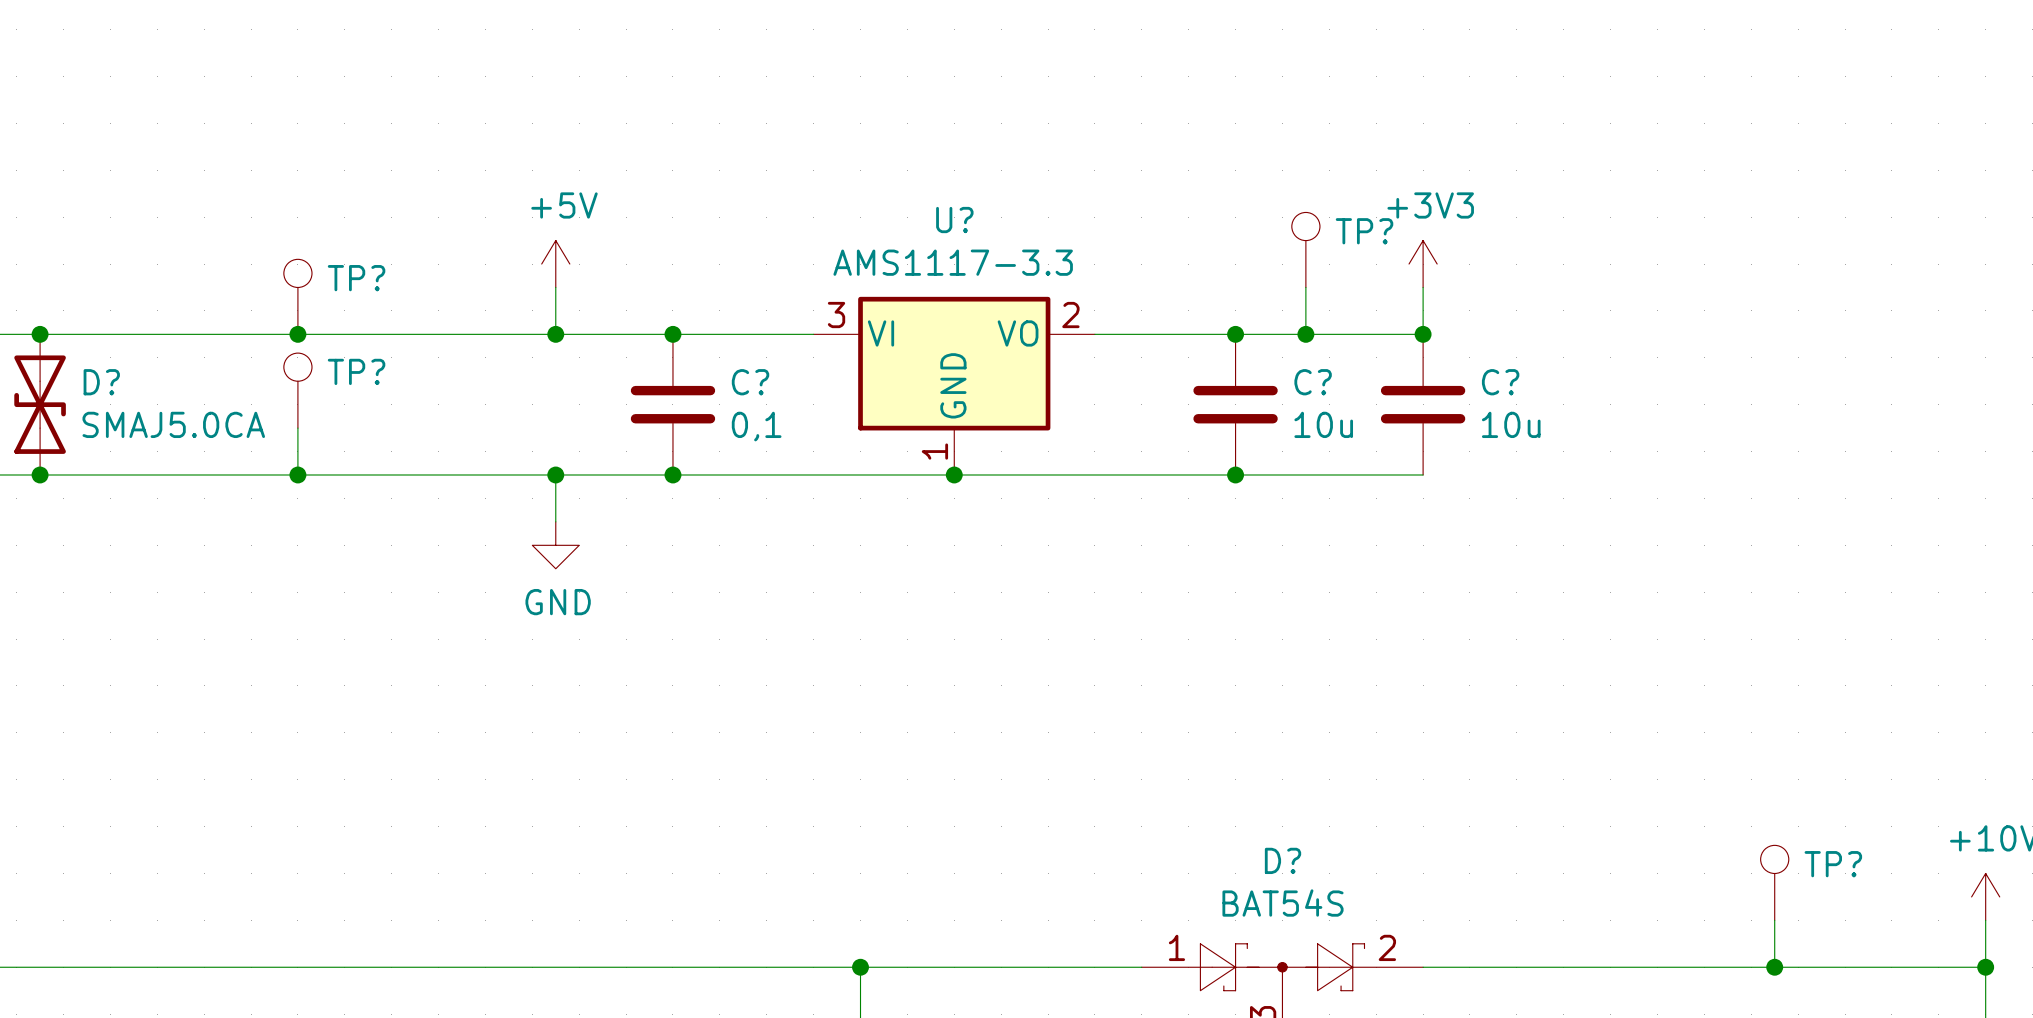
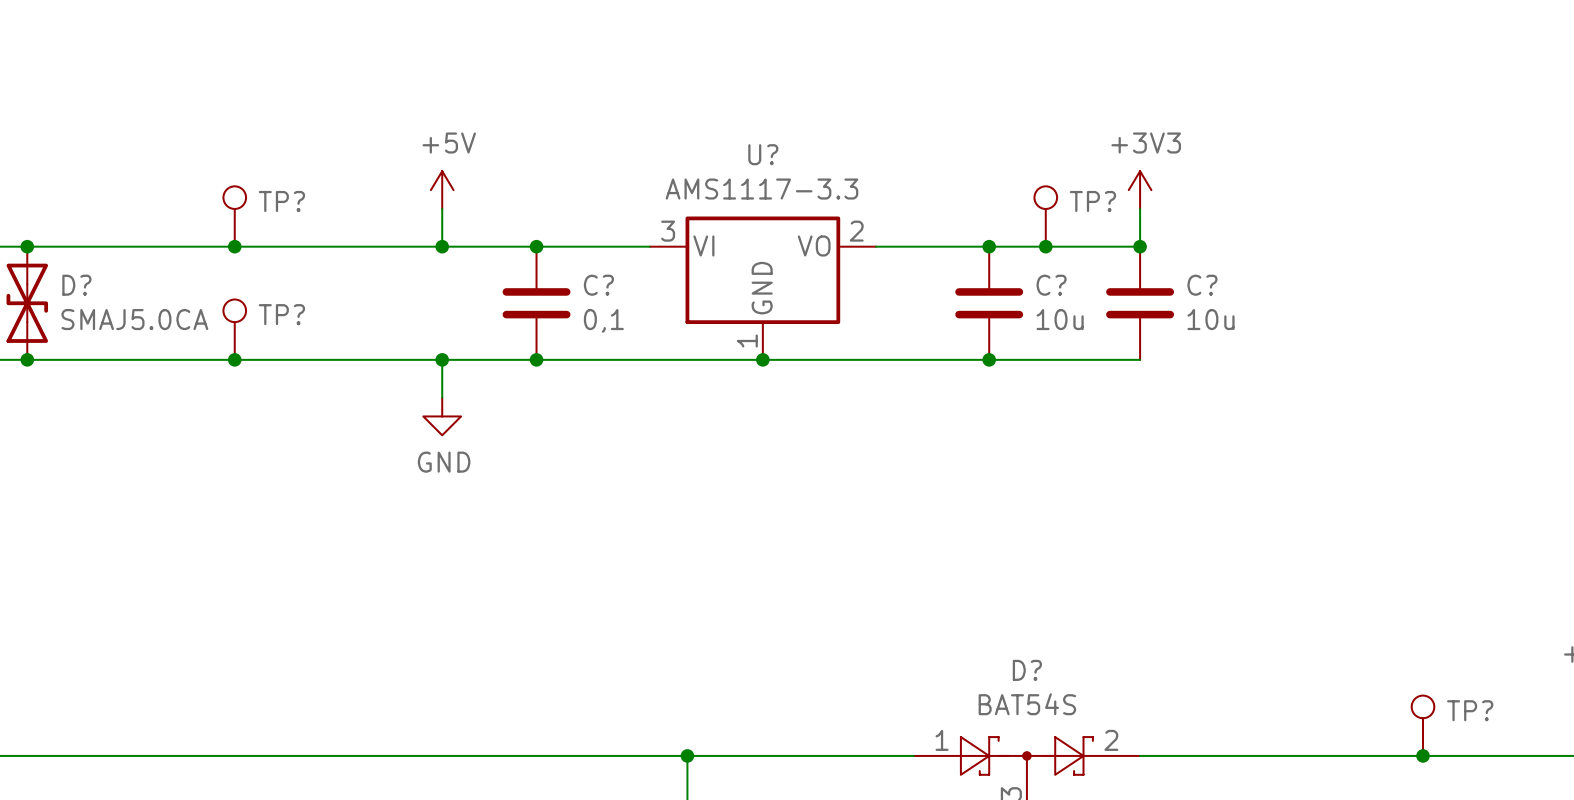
TP? position: (1305, 249) -> (1045, 216)
TP? position: (297, 390) -> (234, 329)
TP? position: (1774, 882) -> (1423, 725)

